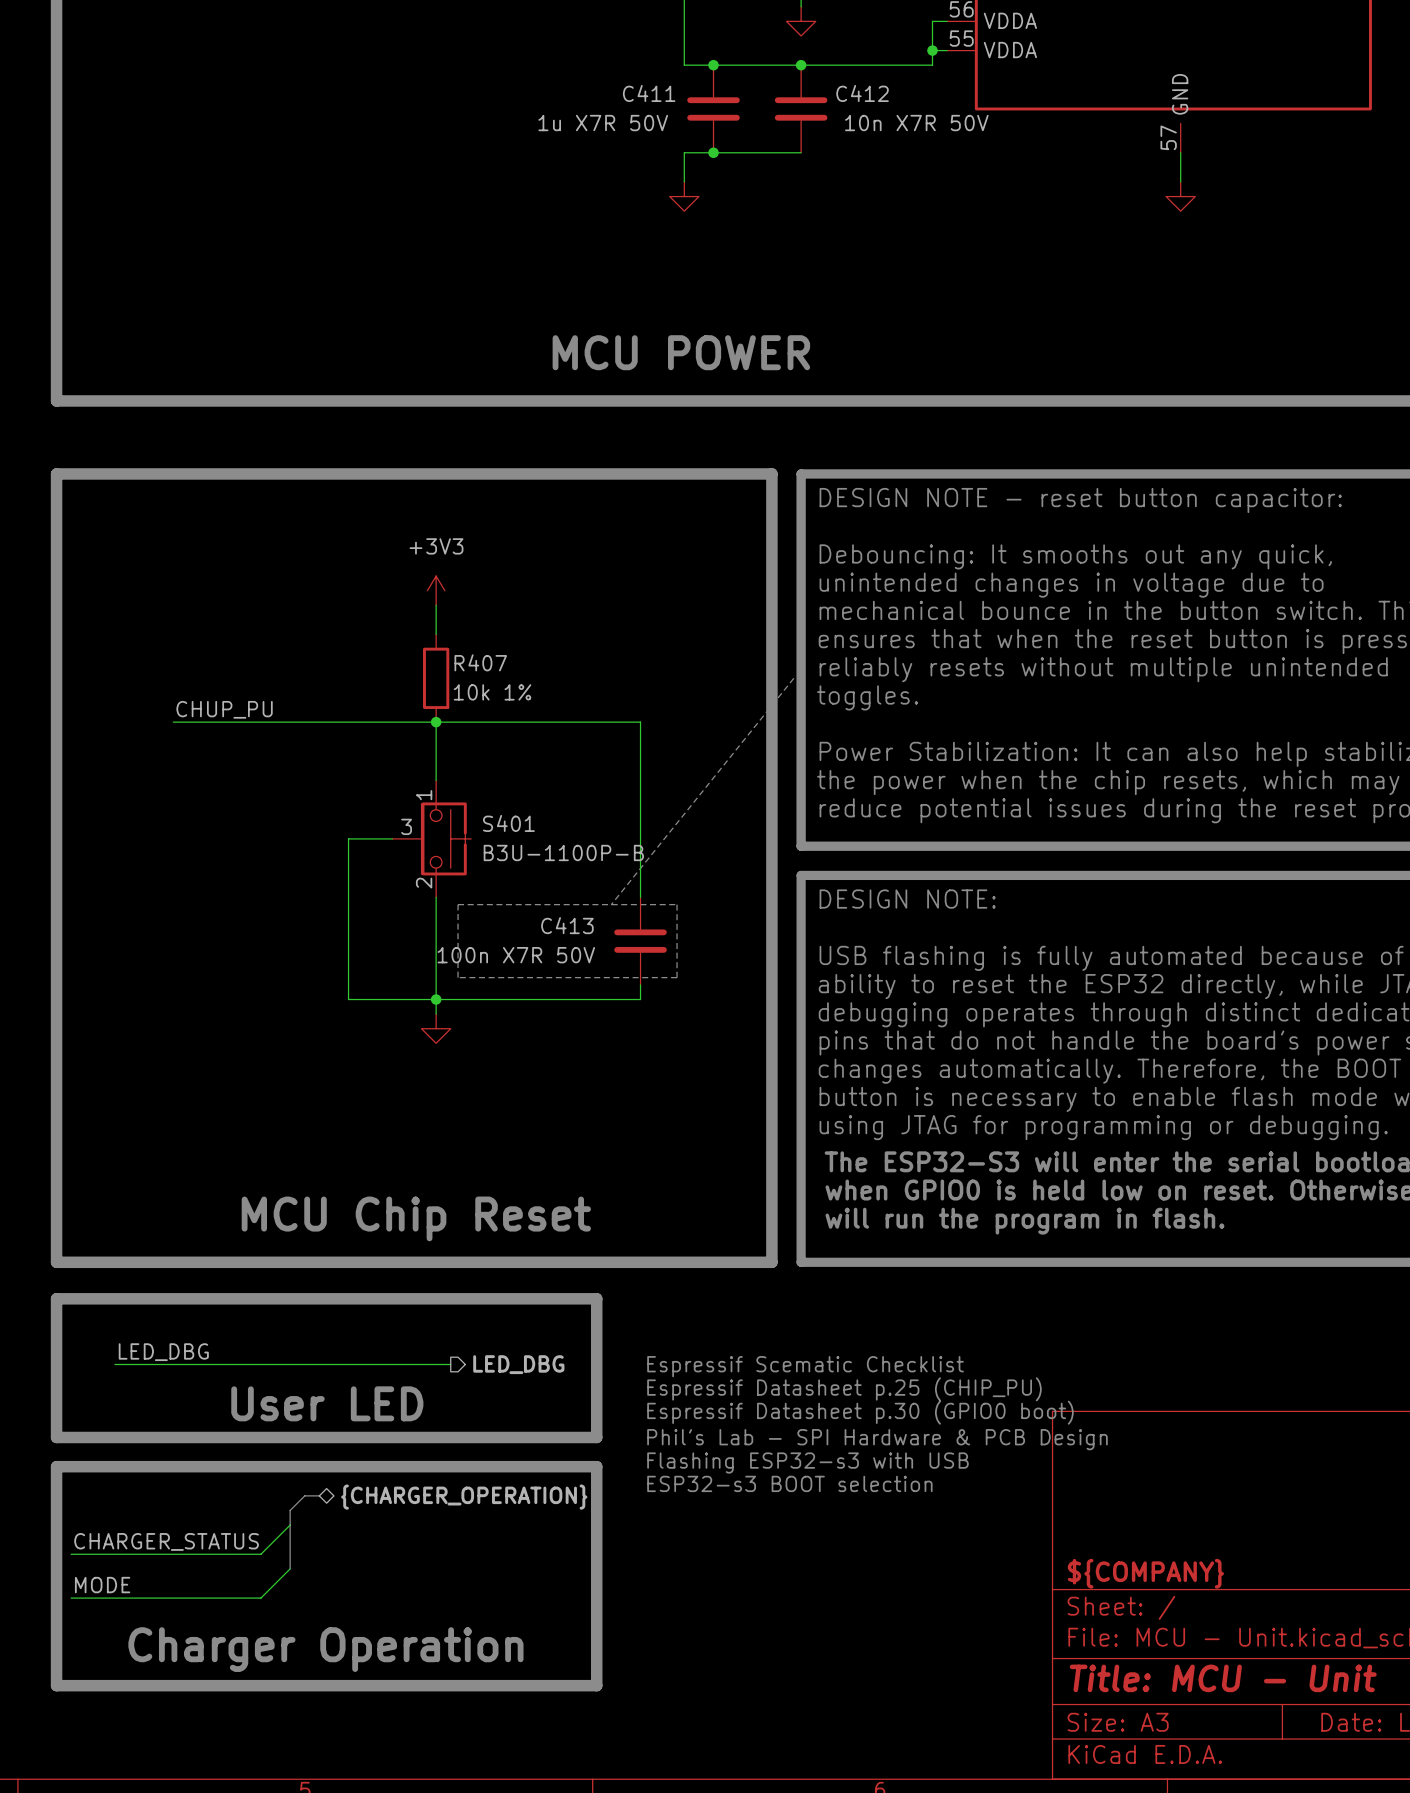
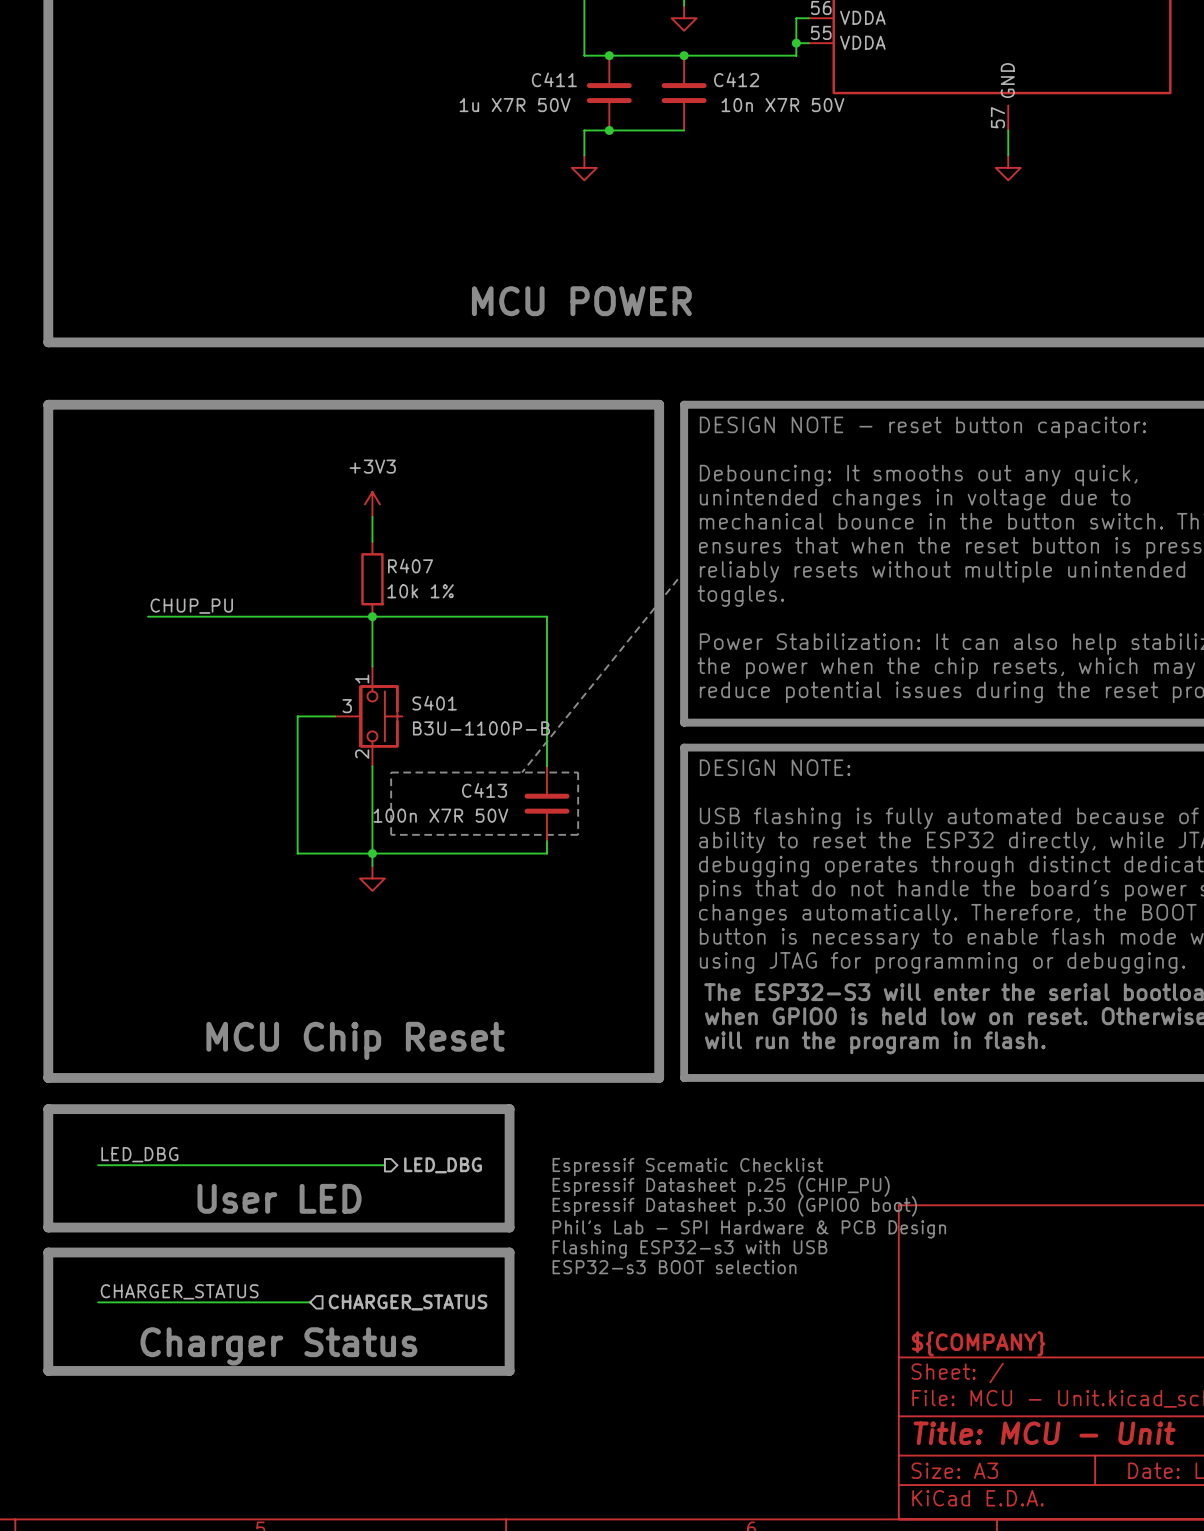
bus: (319, 1495) (304, 1495) (290, 1510) (290, 1568) -> none
hierarchical label shape: bidirectional (464, 1497) -> input (408, 1302)
hierarchical label: {CHARGER_OPERATION} (464, 1497) -> CHARGER_STATUS (408, 1302)
wire: none -> (98, 1302) (310, 1302)
wire: (290, 1525) (260, 1554) (71, 1554) -> none
label position: CHARGER_STATUS (166, 1541) -> CHARGER_STATUS (179, 1291)
wire: (290, 1568) (260, 1598) (71, 1598) -> none
text: none -> Charger Status (278, 1346)
label: MODE (102, 1585) -> none
line: (56, 1605) (56, 1685) (596, 1685) (596, 1605) -> (48, 1370) (509, 1370)
text: Charger Operation (325, 1649) -> none

